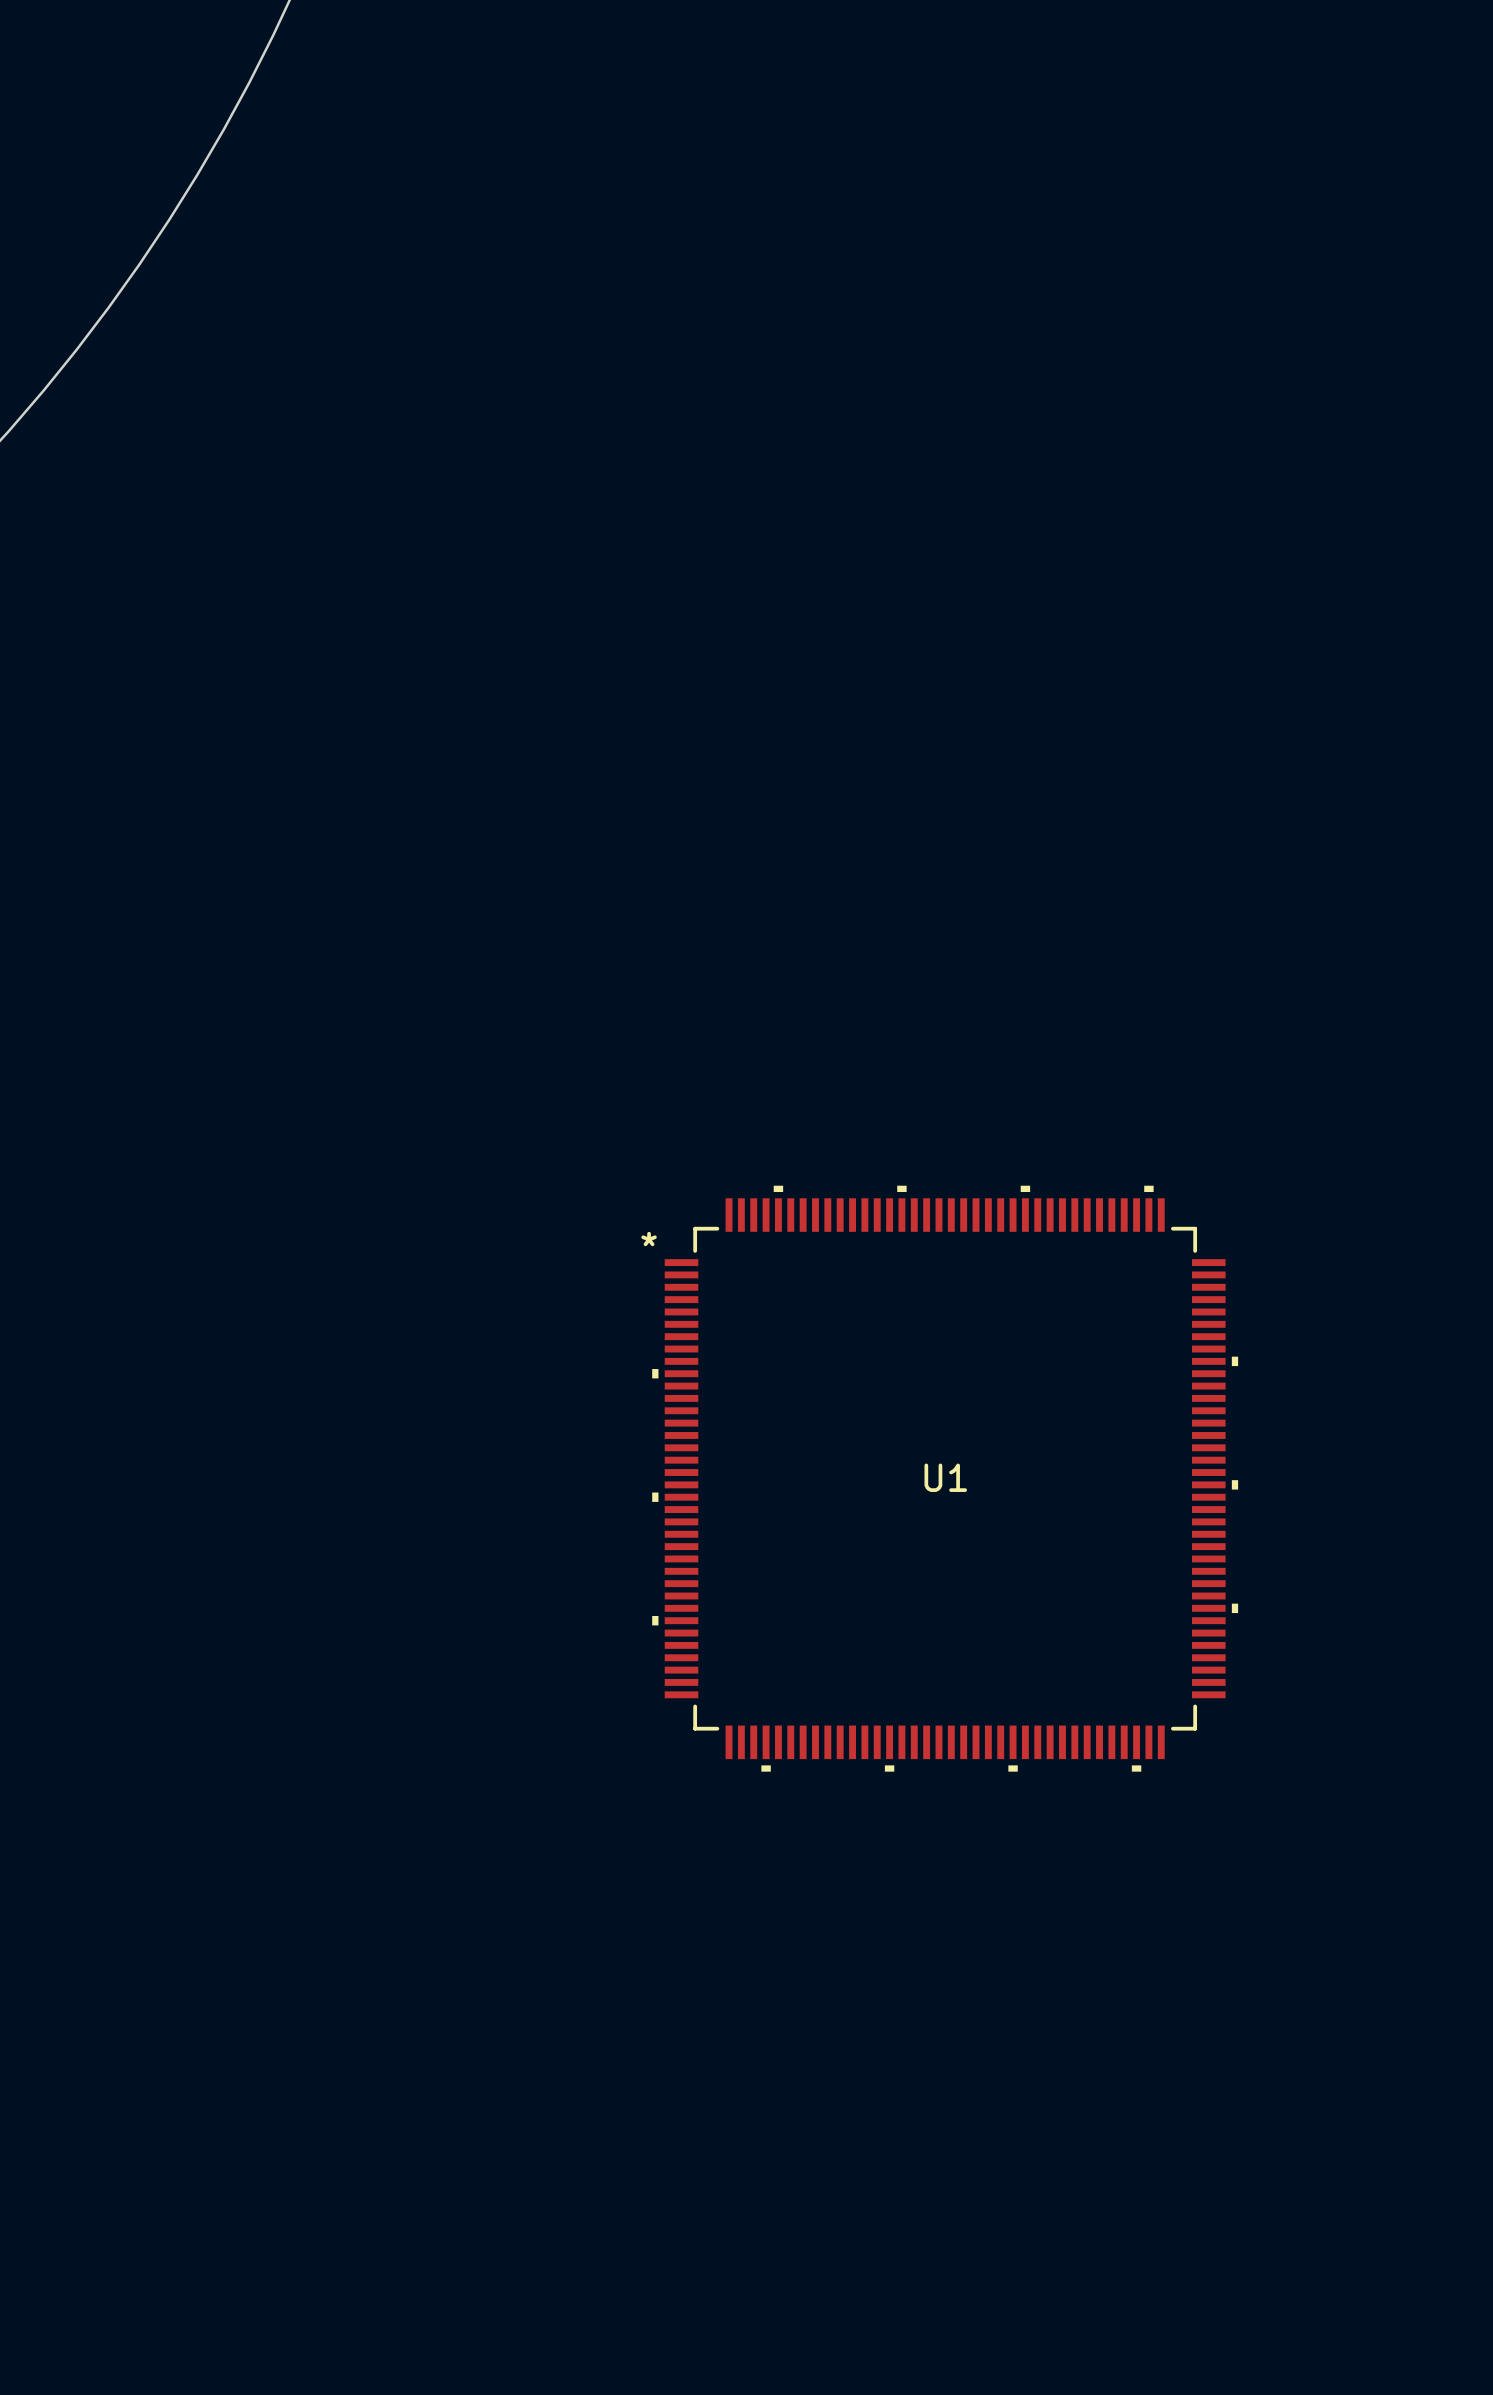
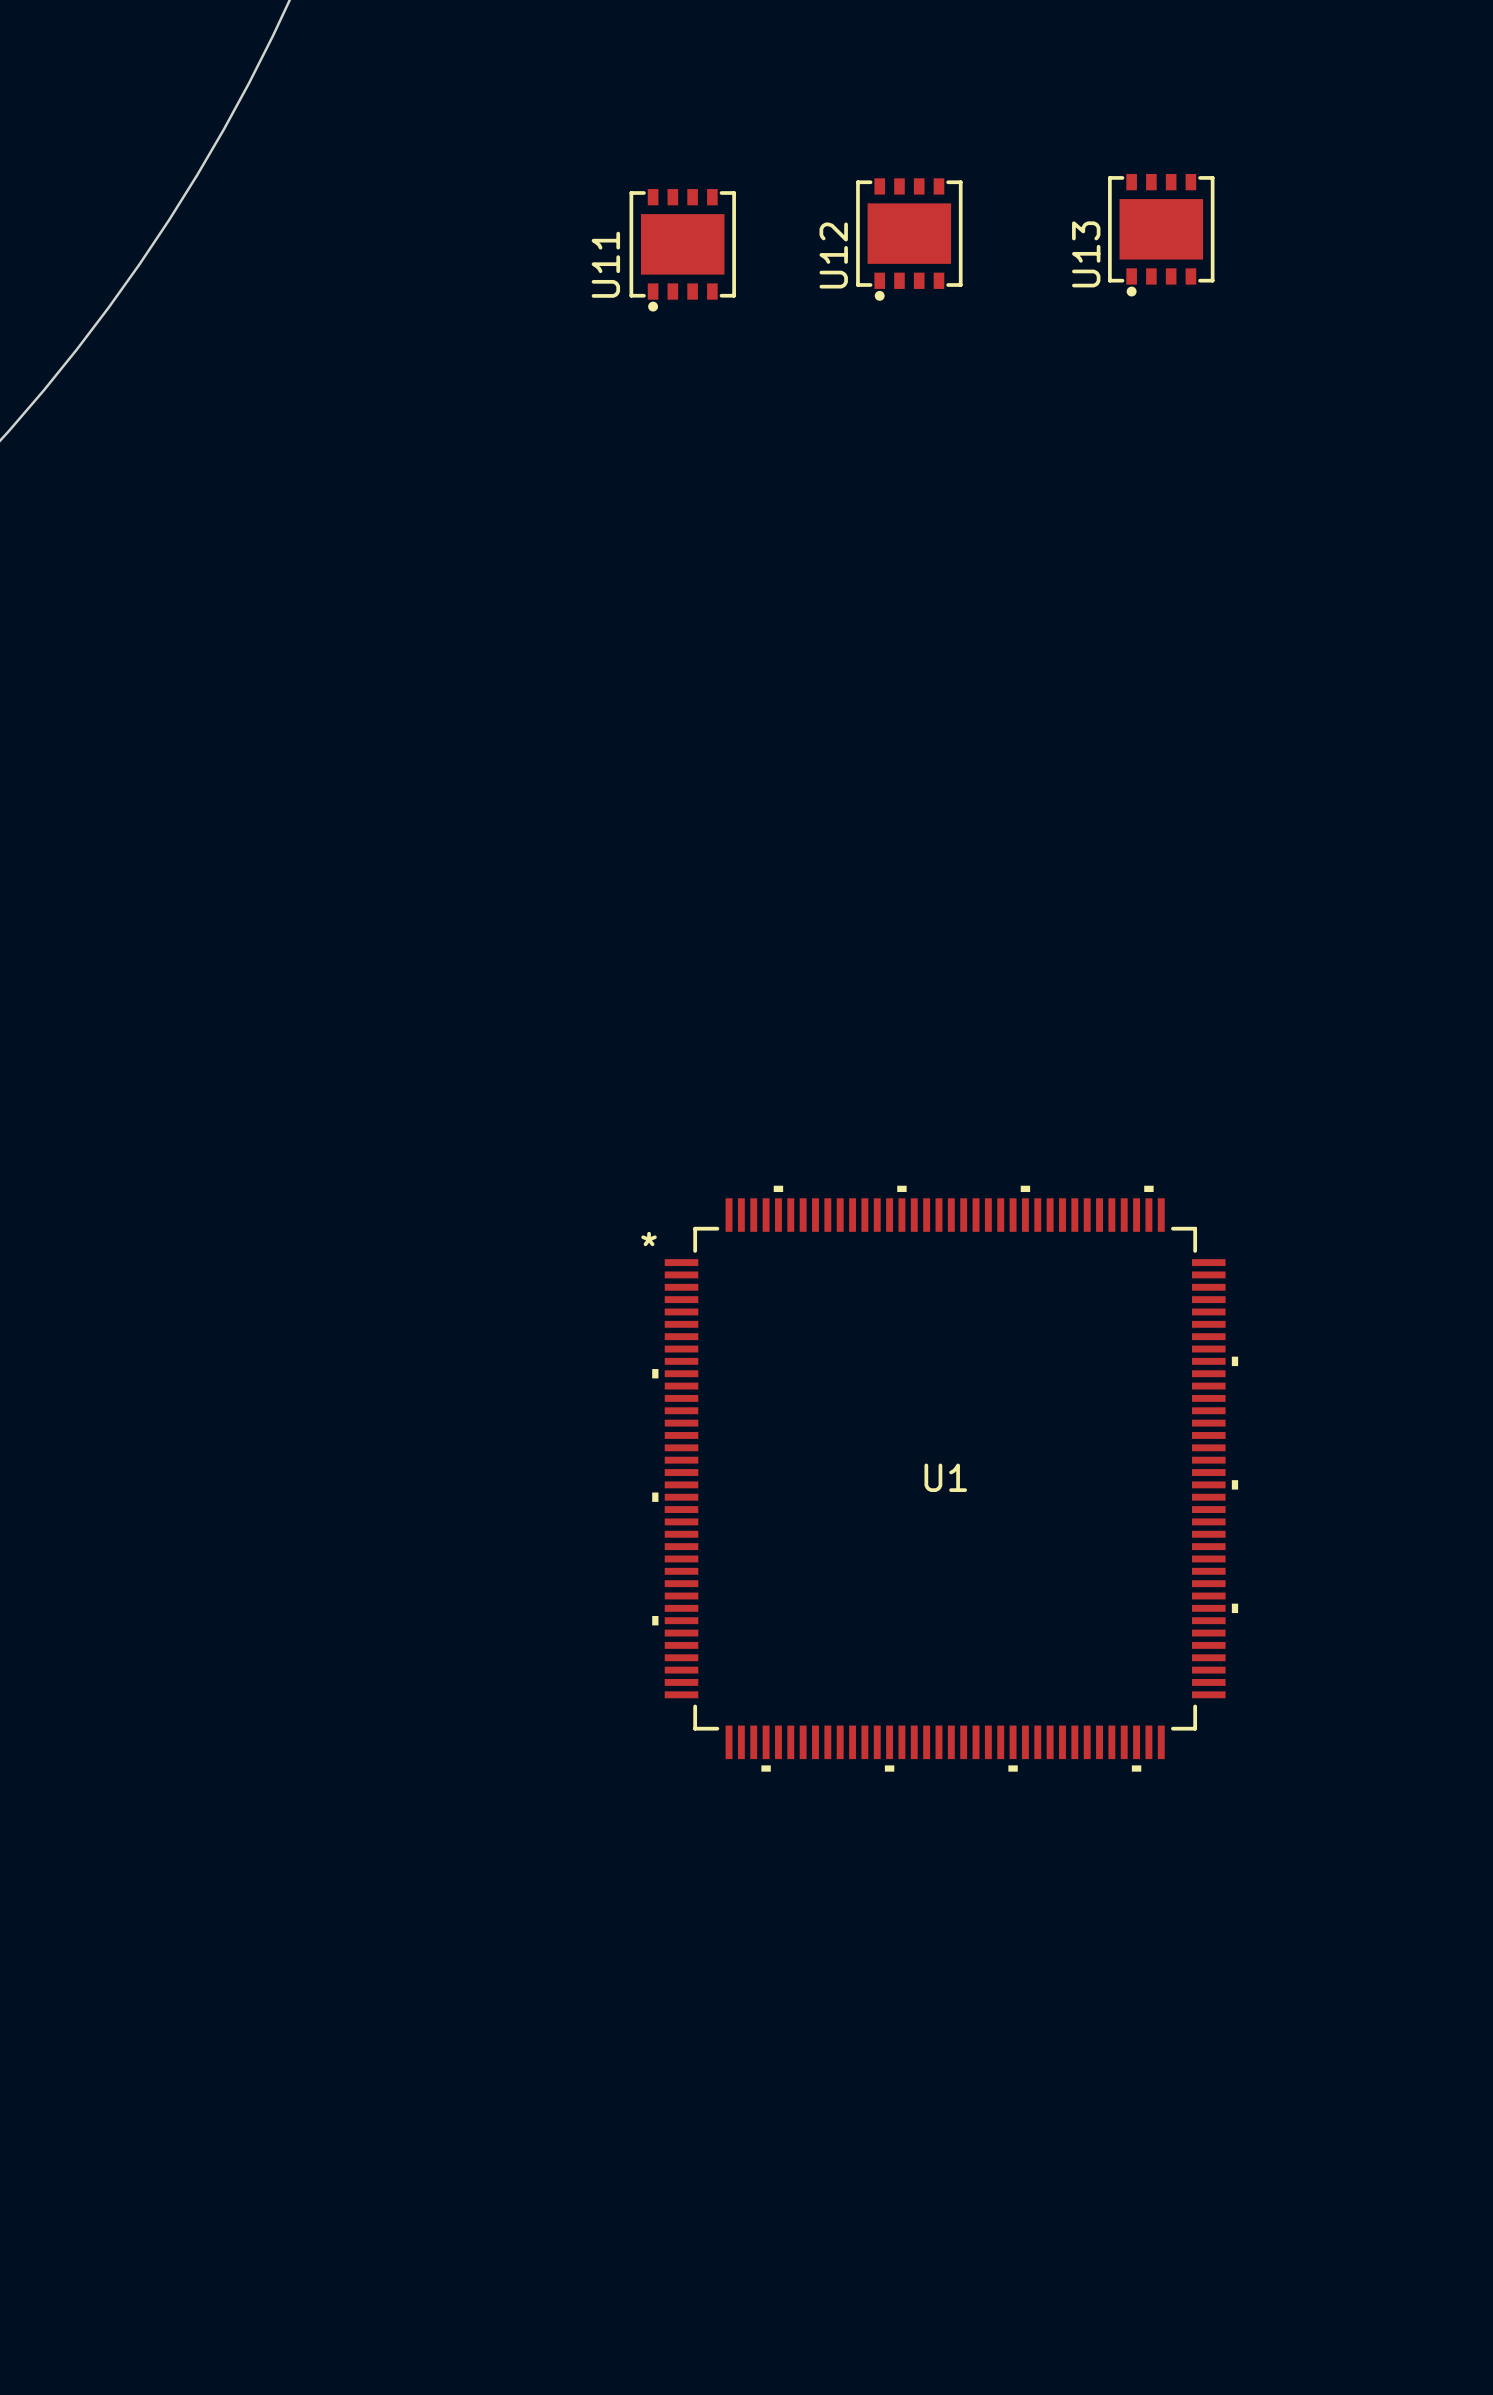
U13: none -> (1161, 235)
U12: none -> (909, 239)
U11: none -> (682, 250)

